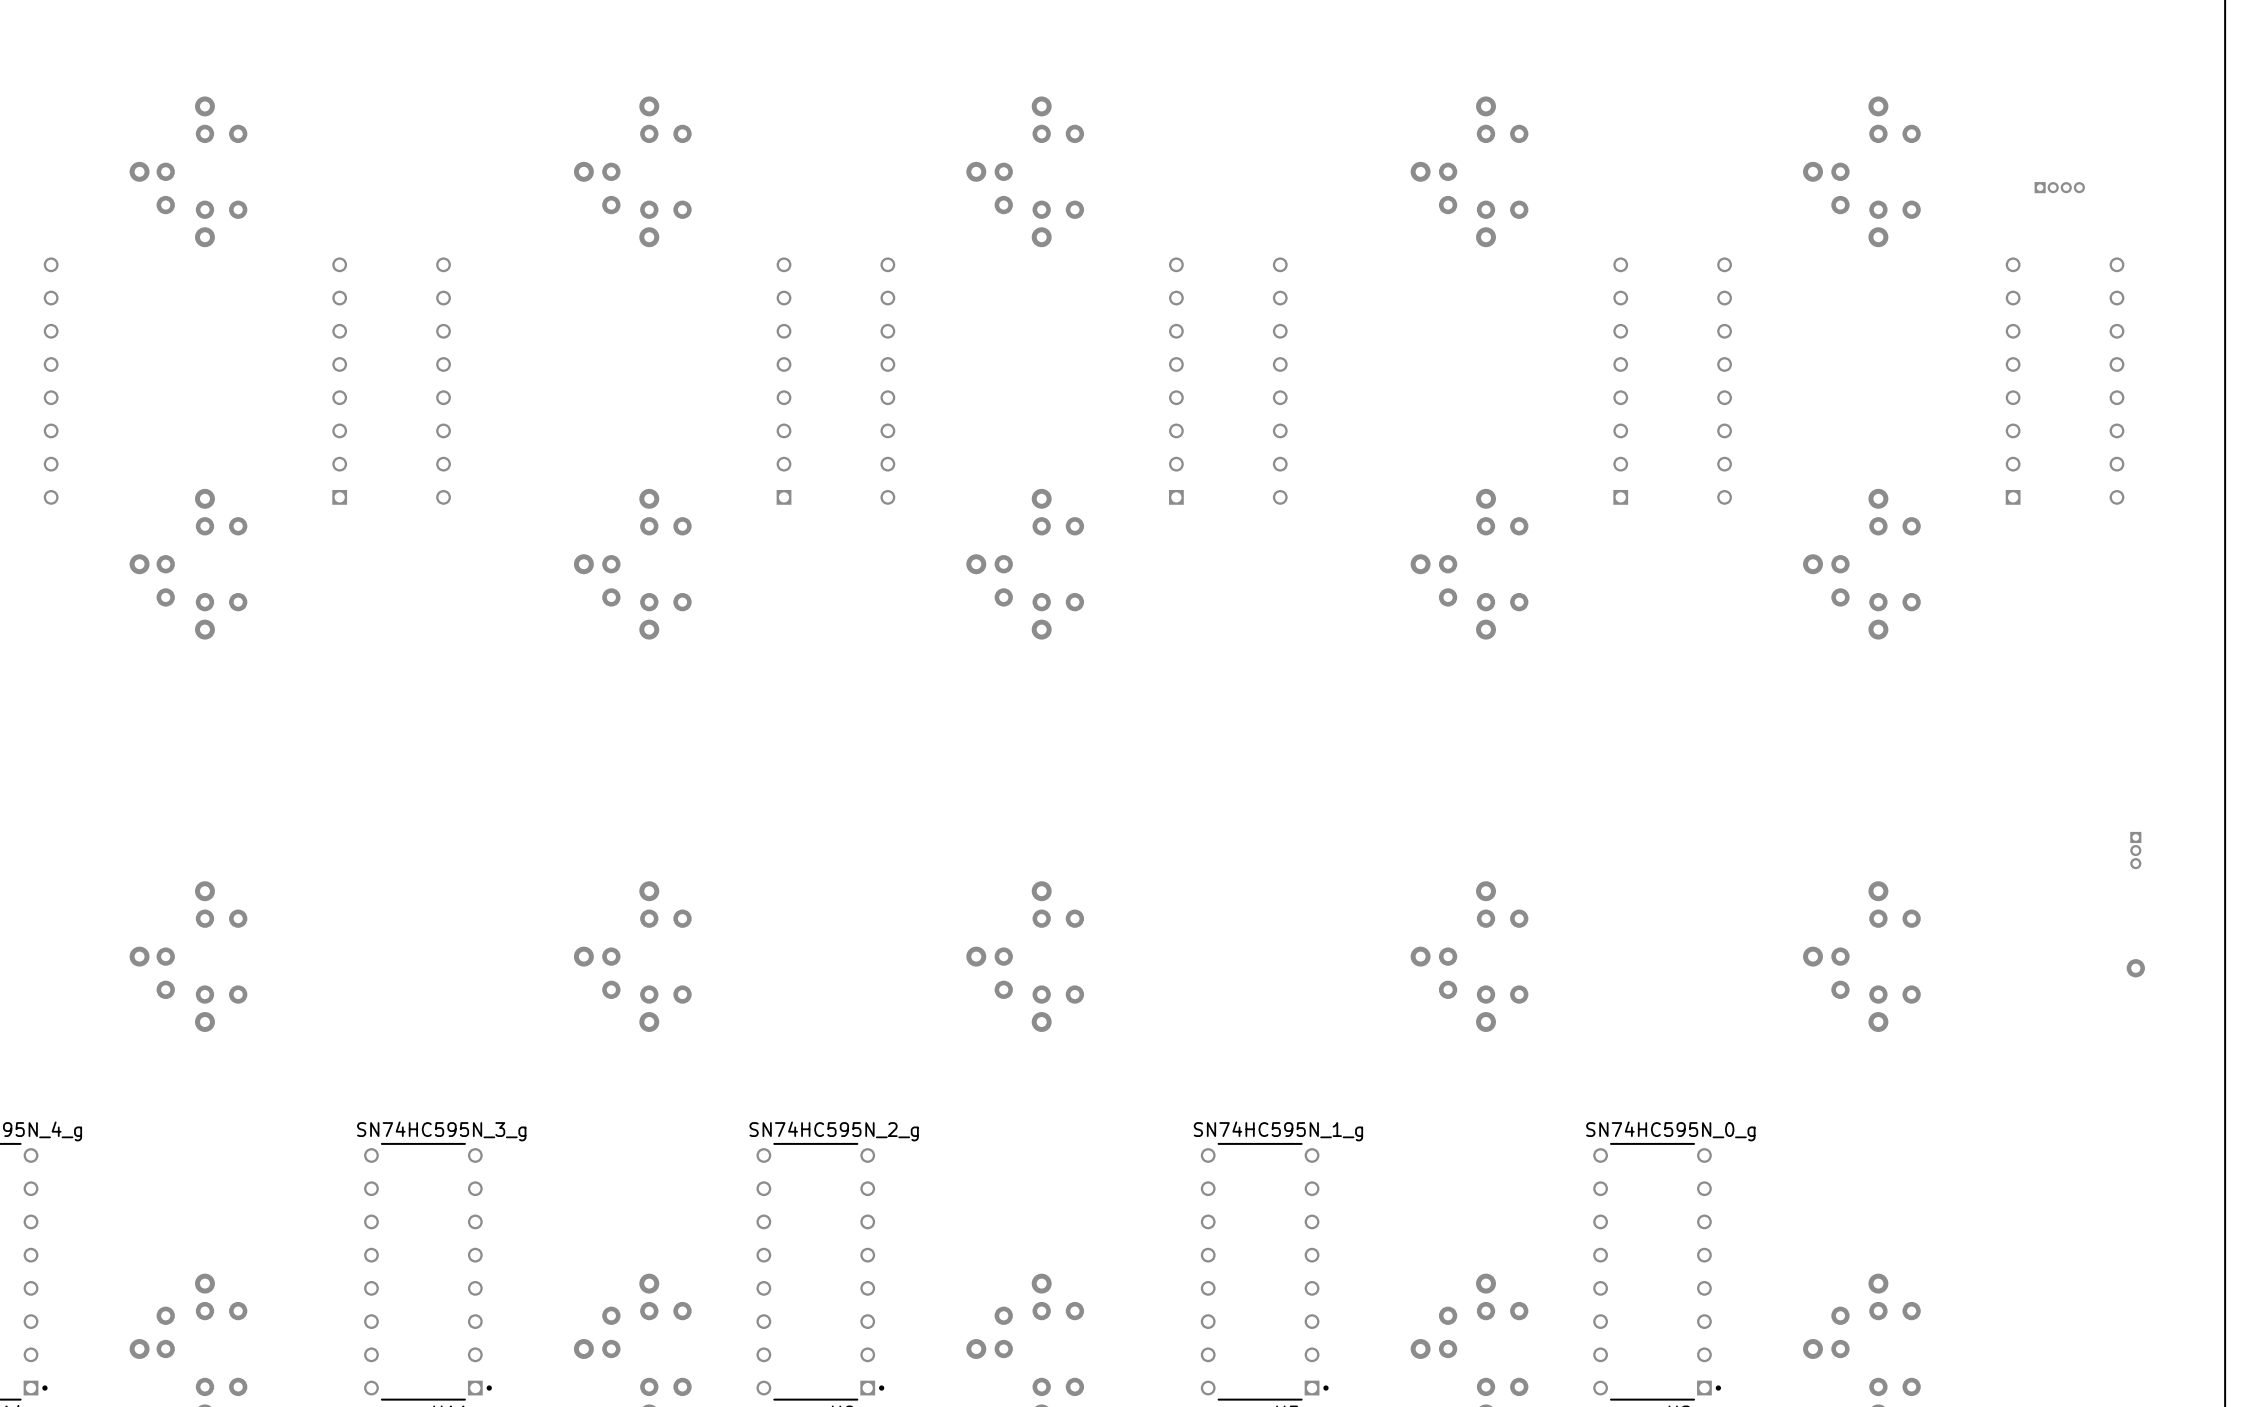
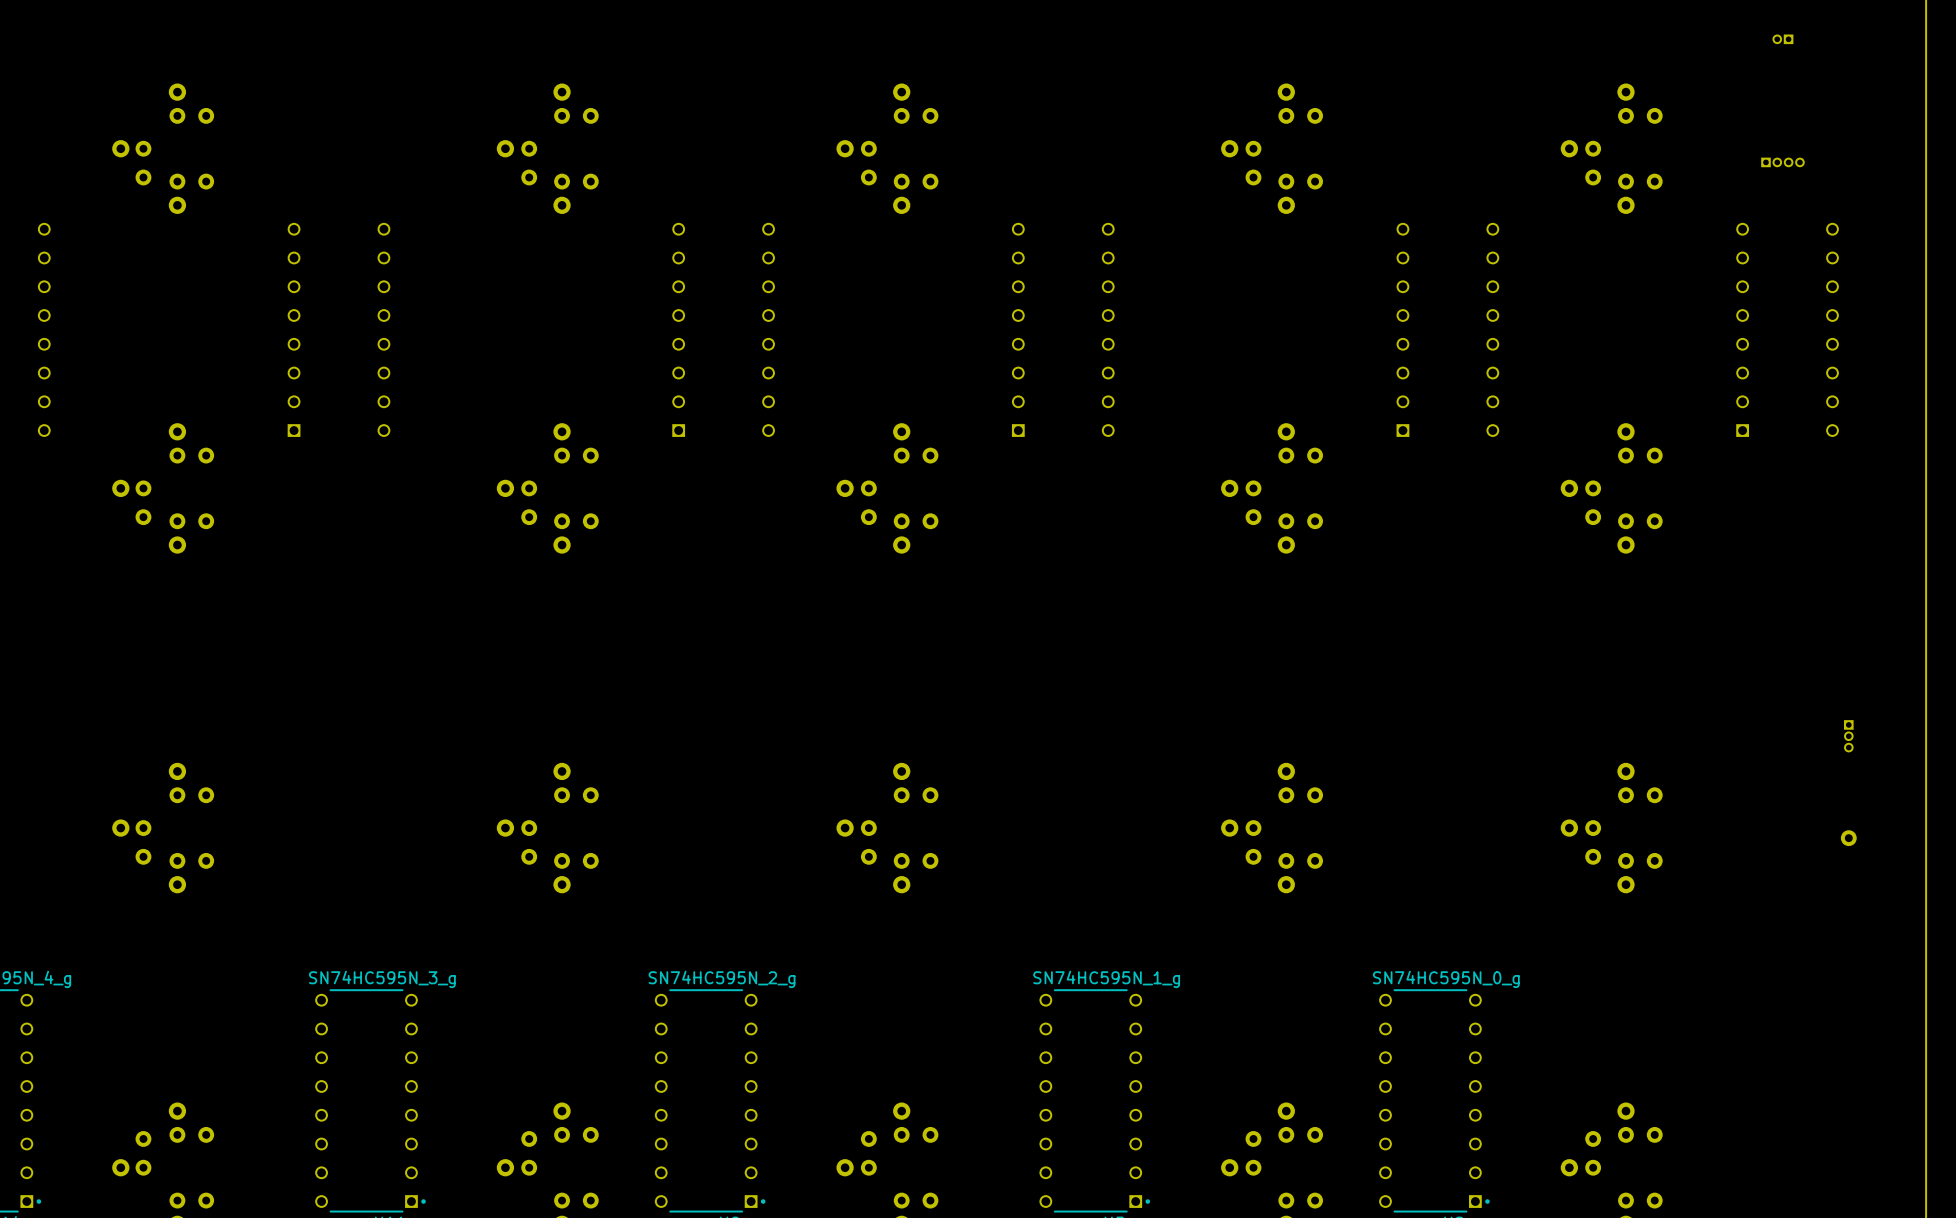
part: none -> (1782, 39)

